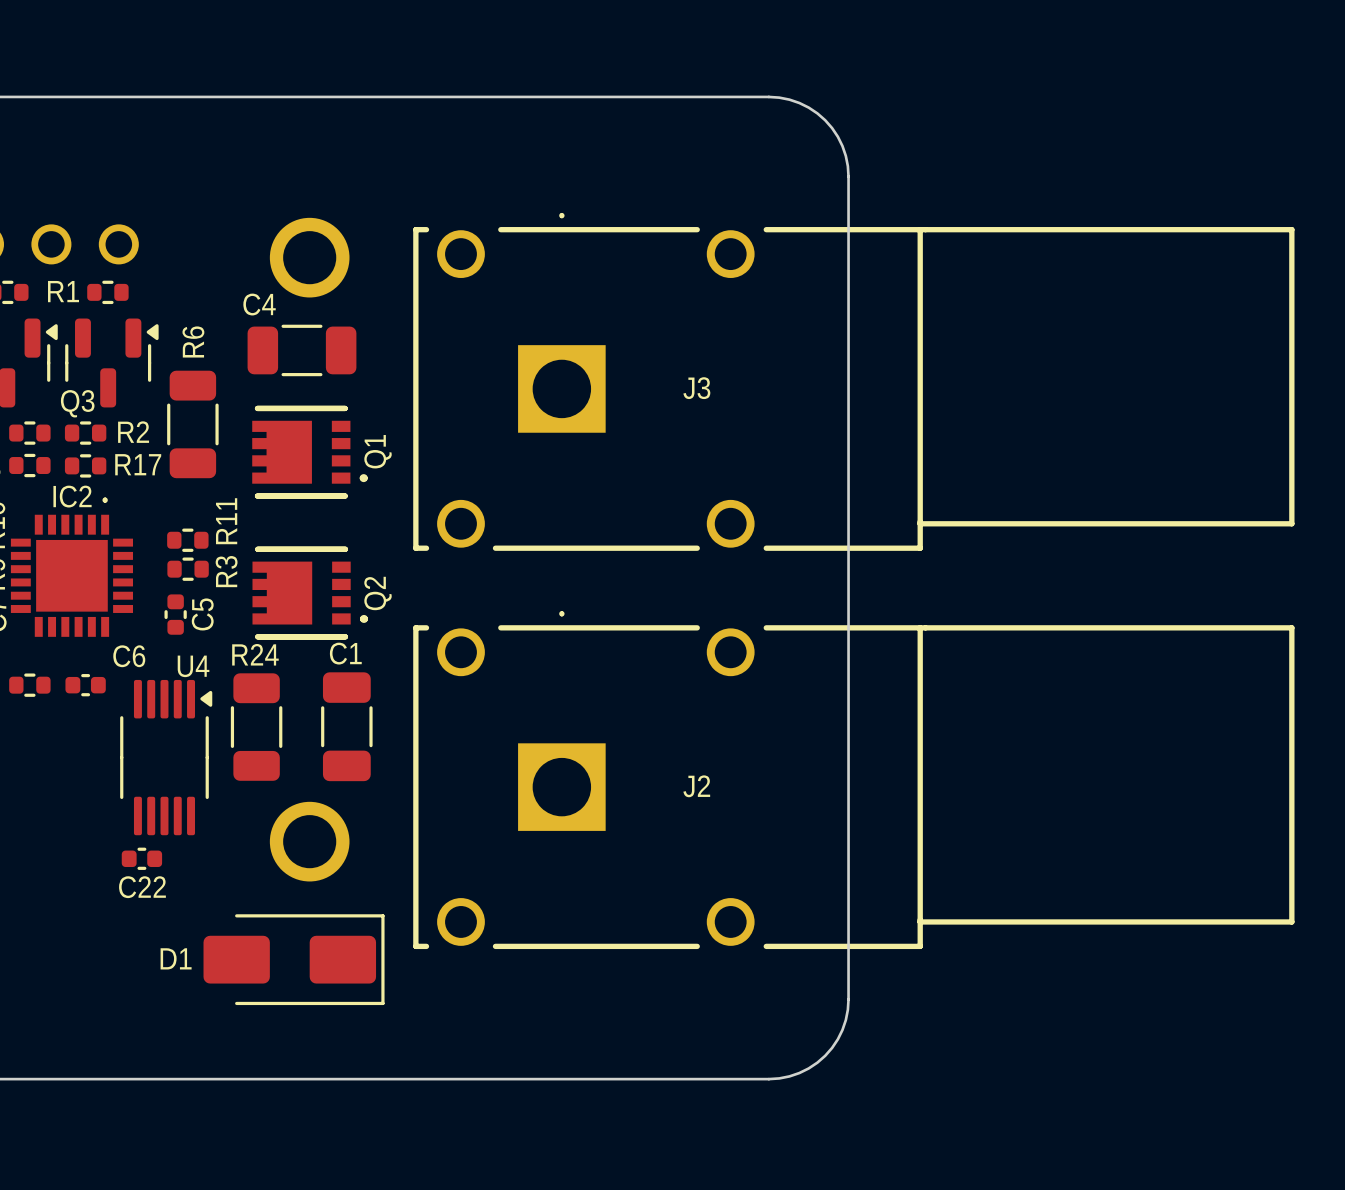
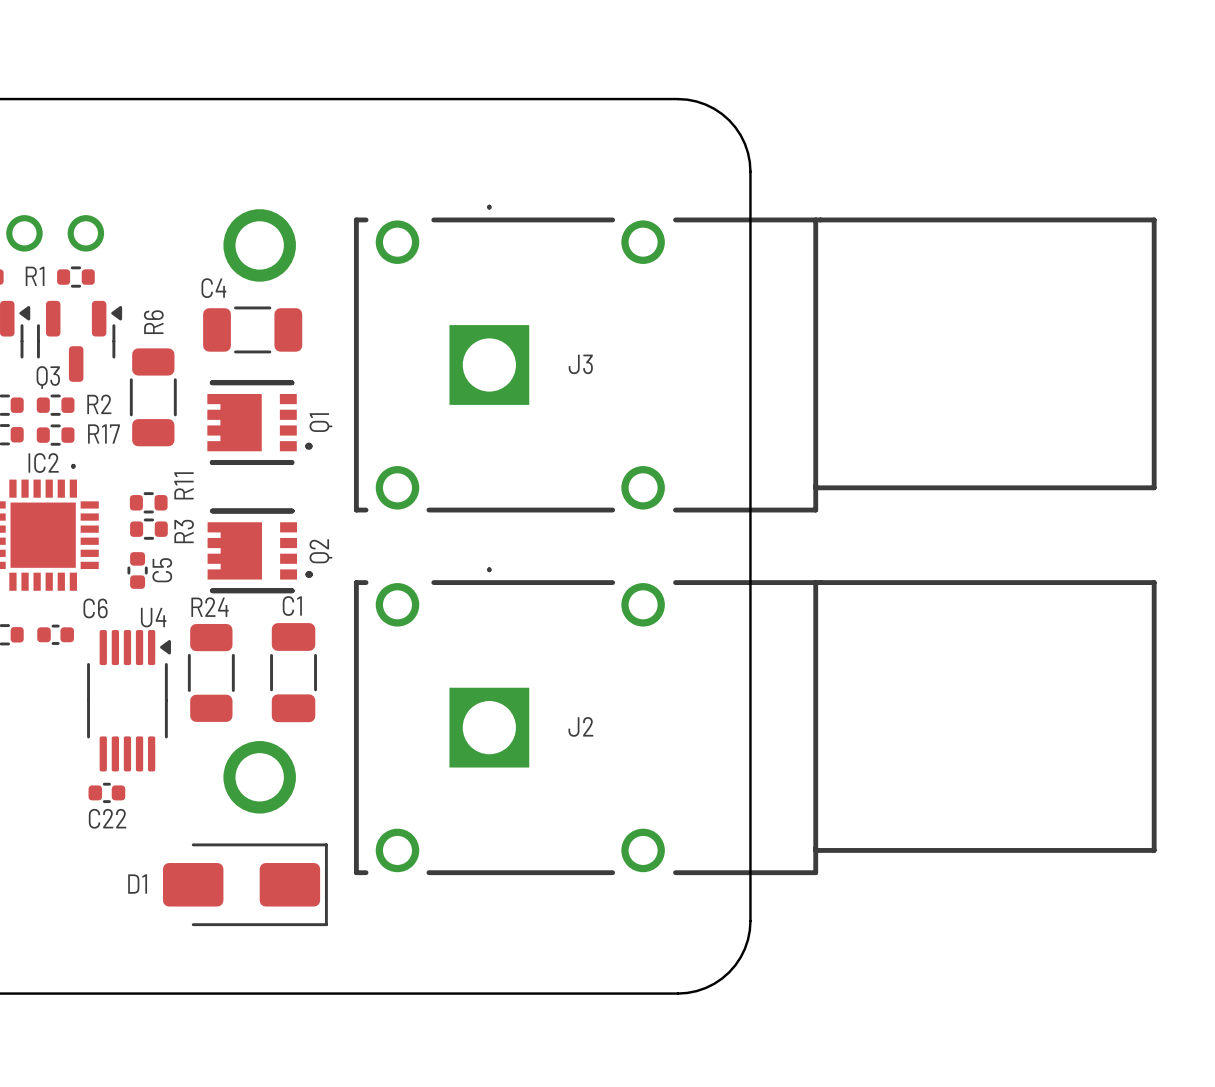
J3 name position: J3 (696, 388) -> J3 (580, 364)
J2 name position: J2 (696, 786) -> J2 (580, 726)

